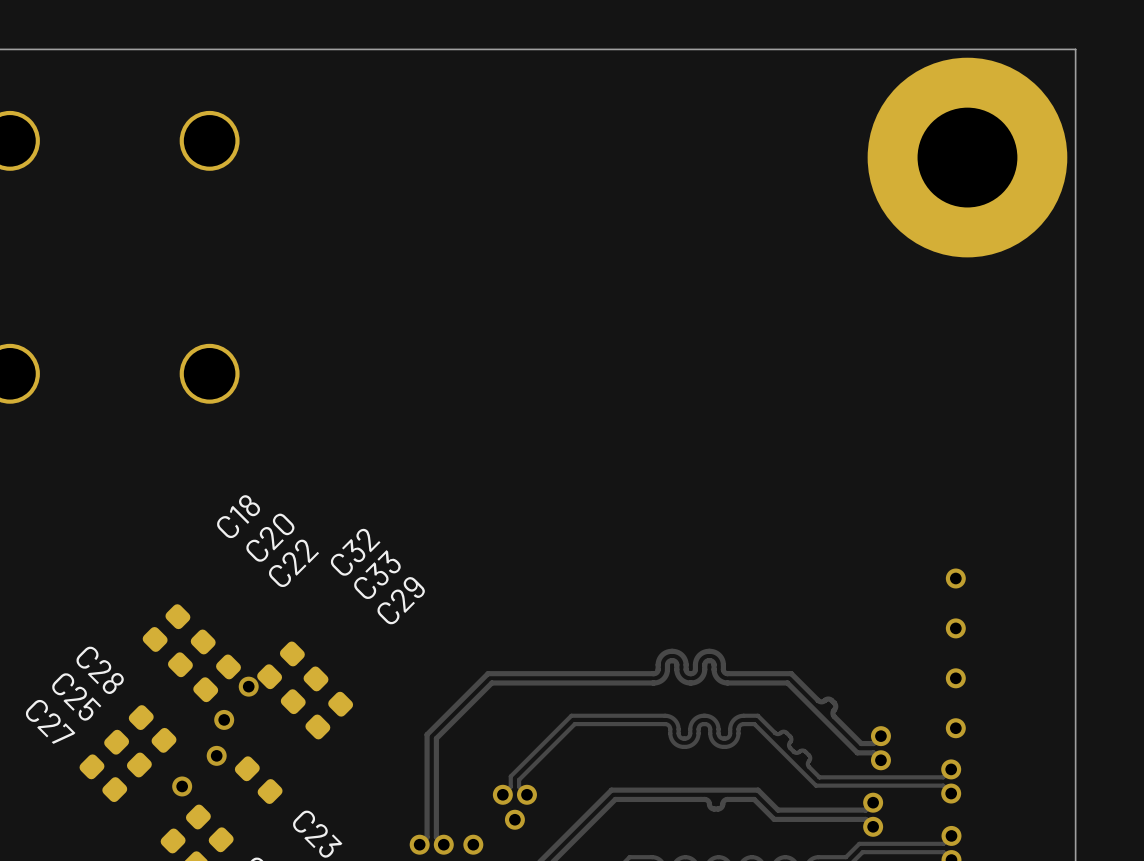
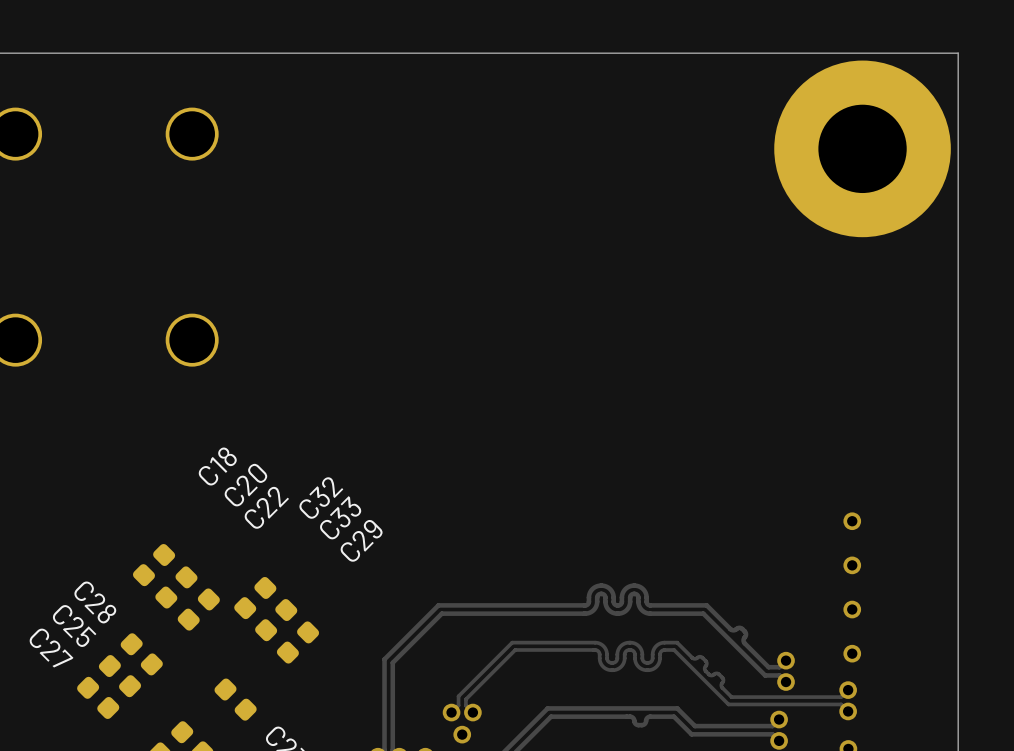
via: (248, 686) -> none
via: (224, 719) -> none
via: (216, 755) -> none
via: (182, 786) -> none

